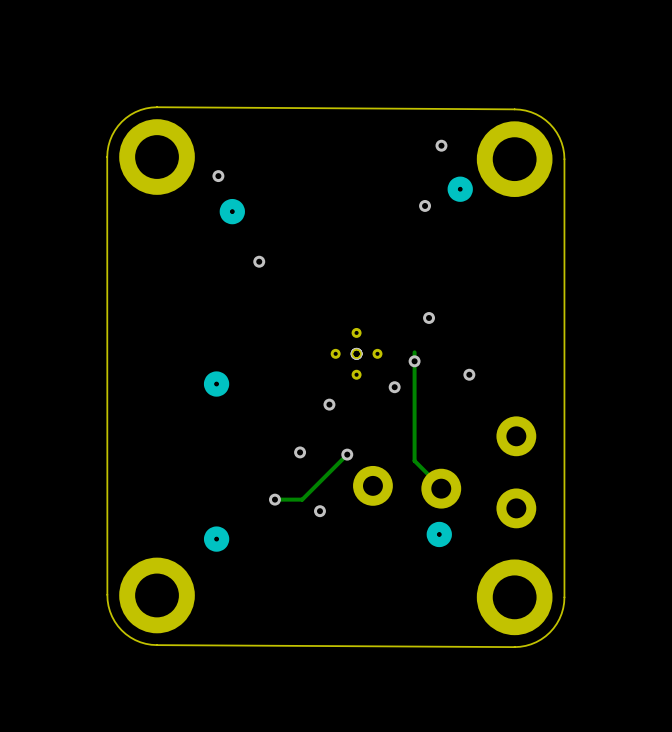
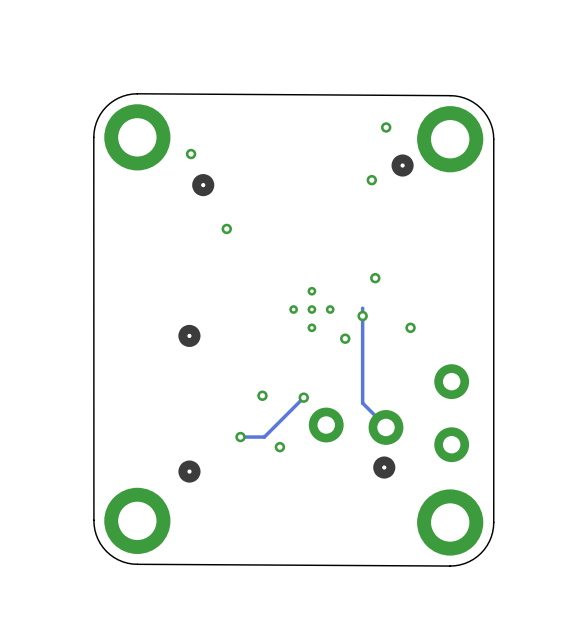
via: (356, 353) -> none
via: (329, 404) -> none

